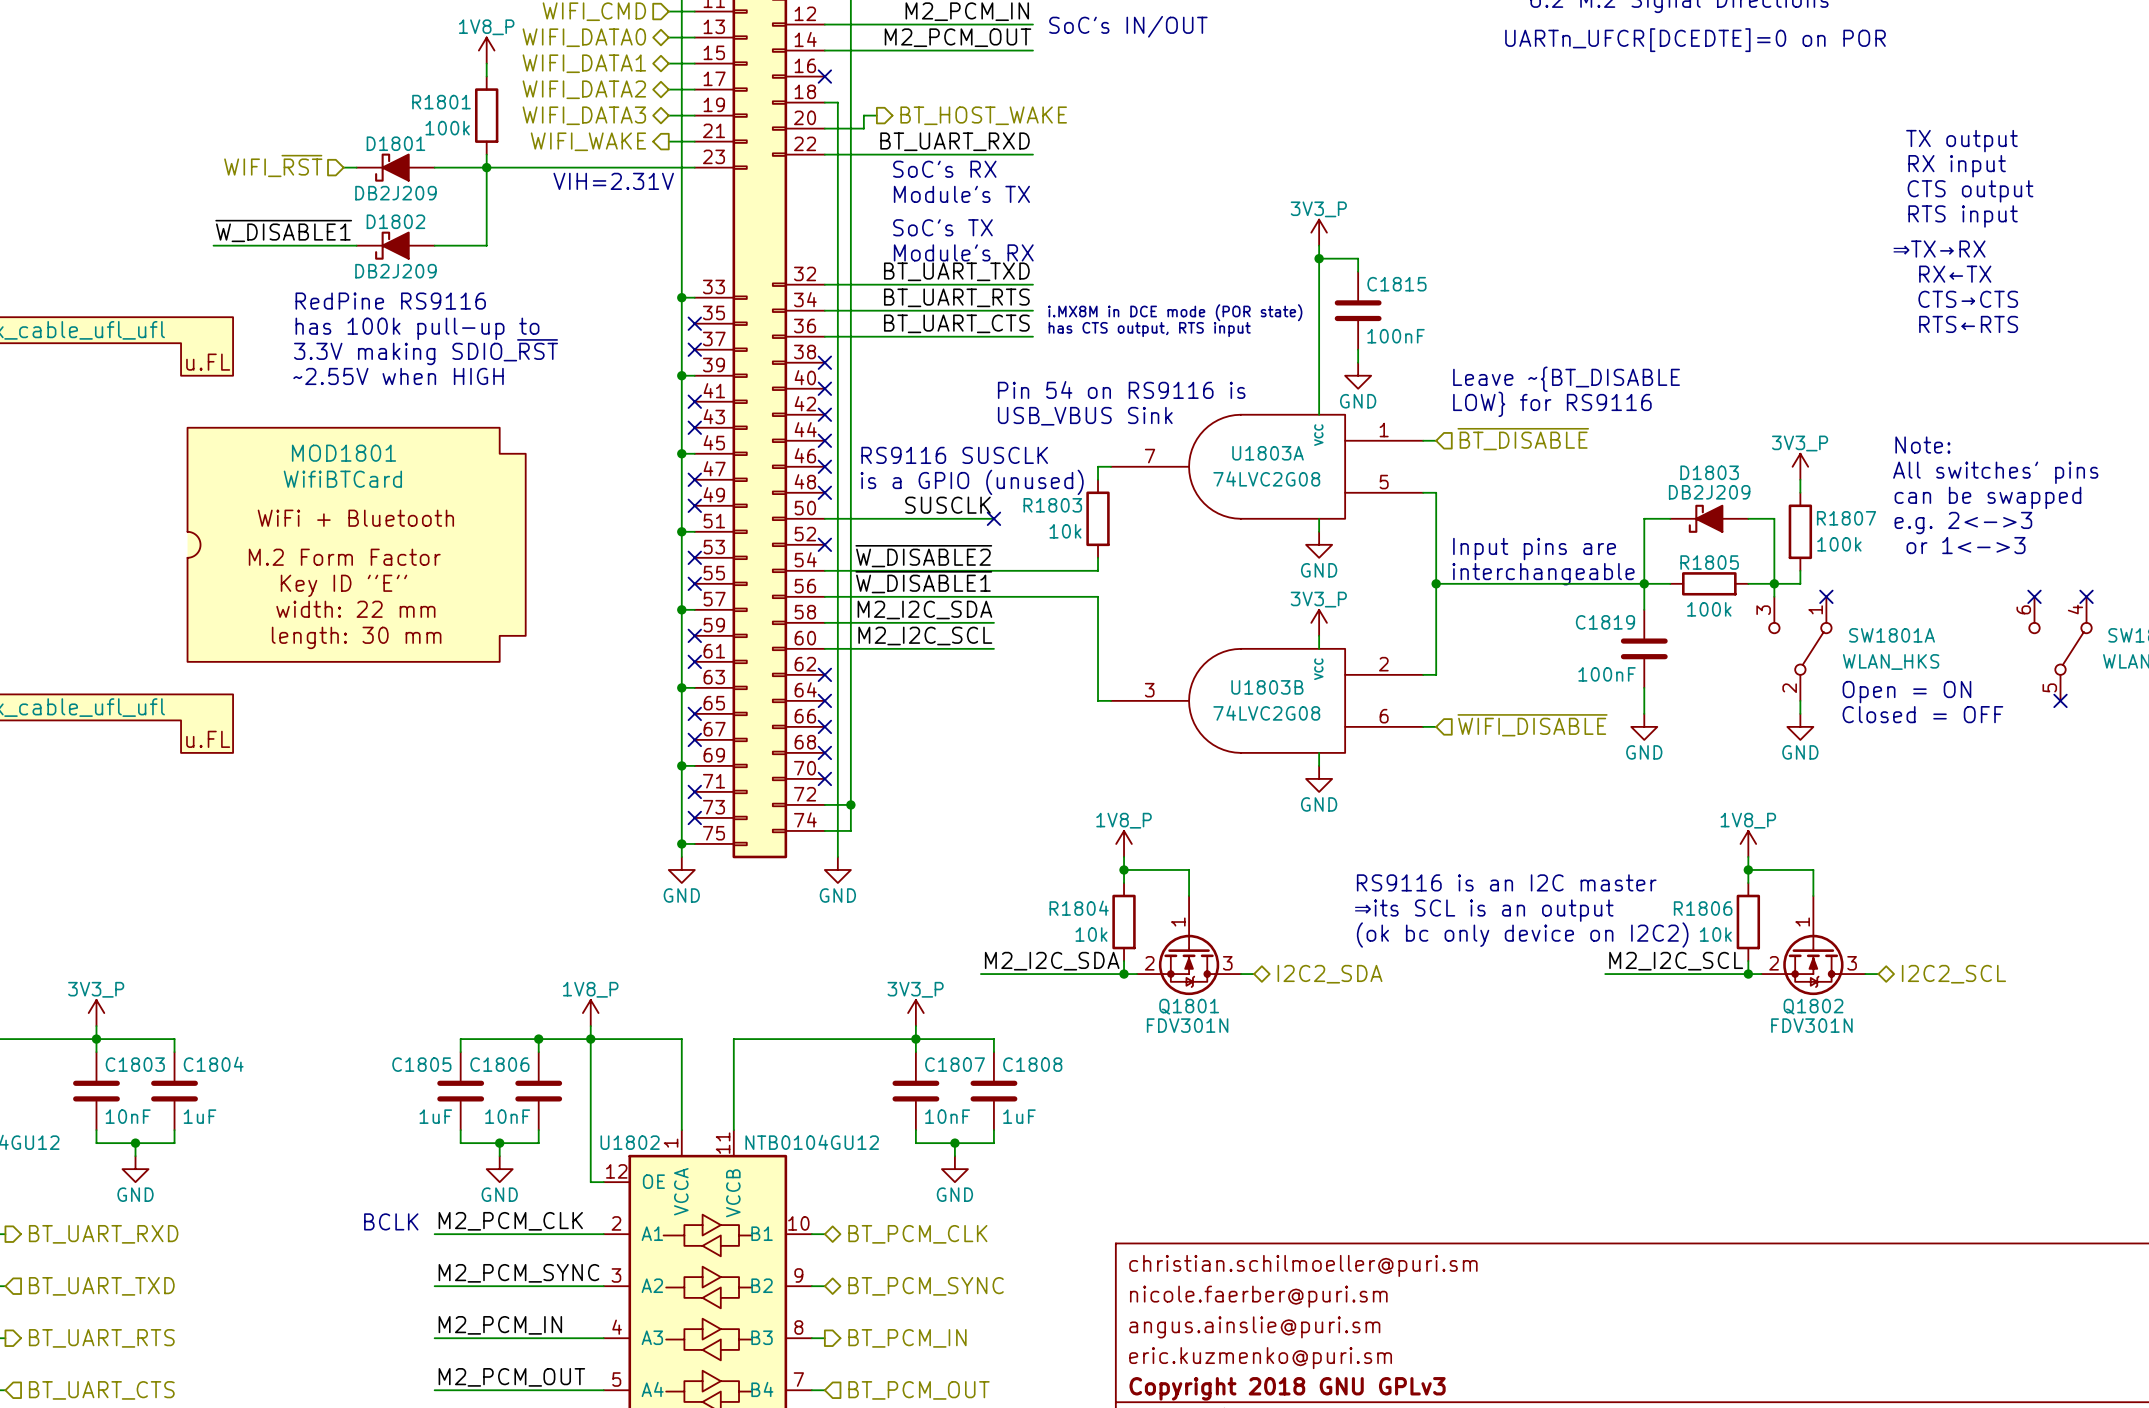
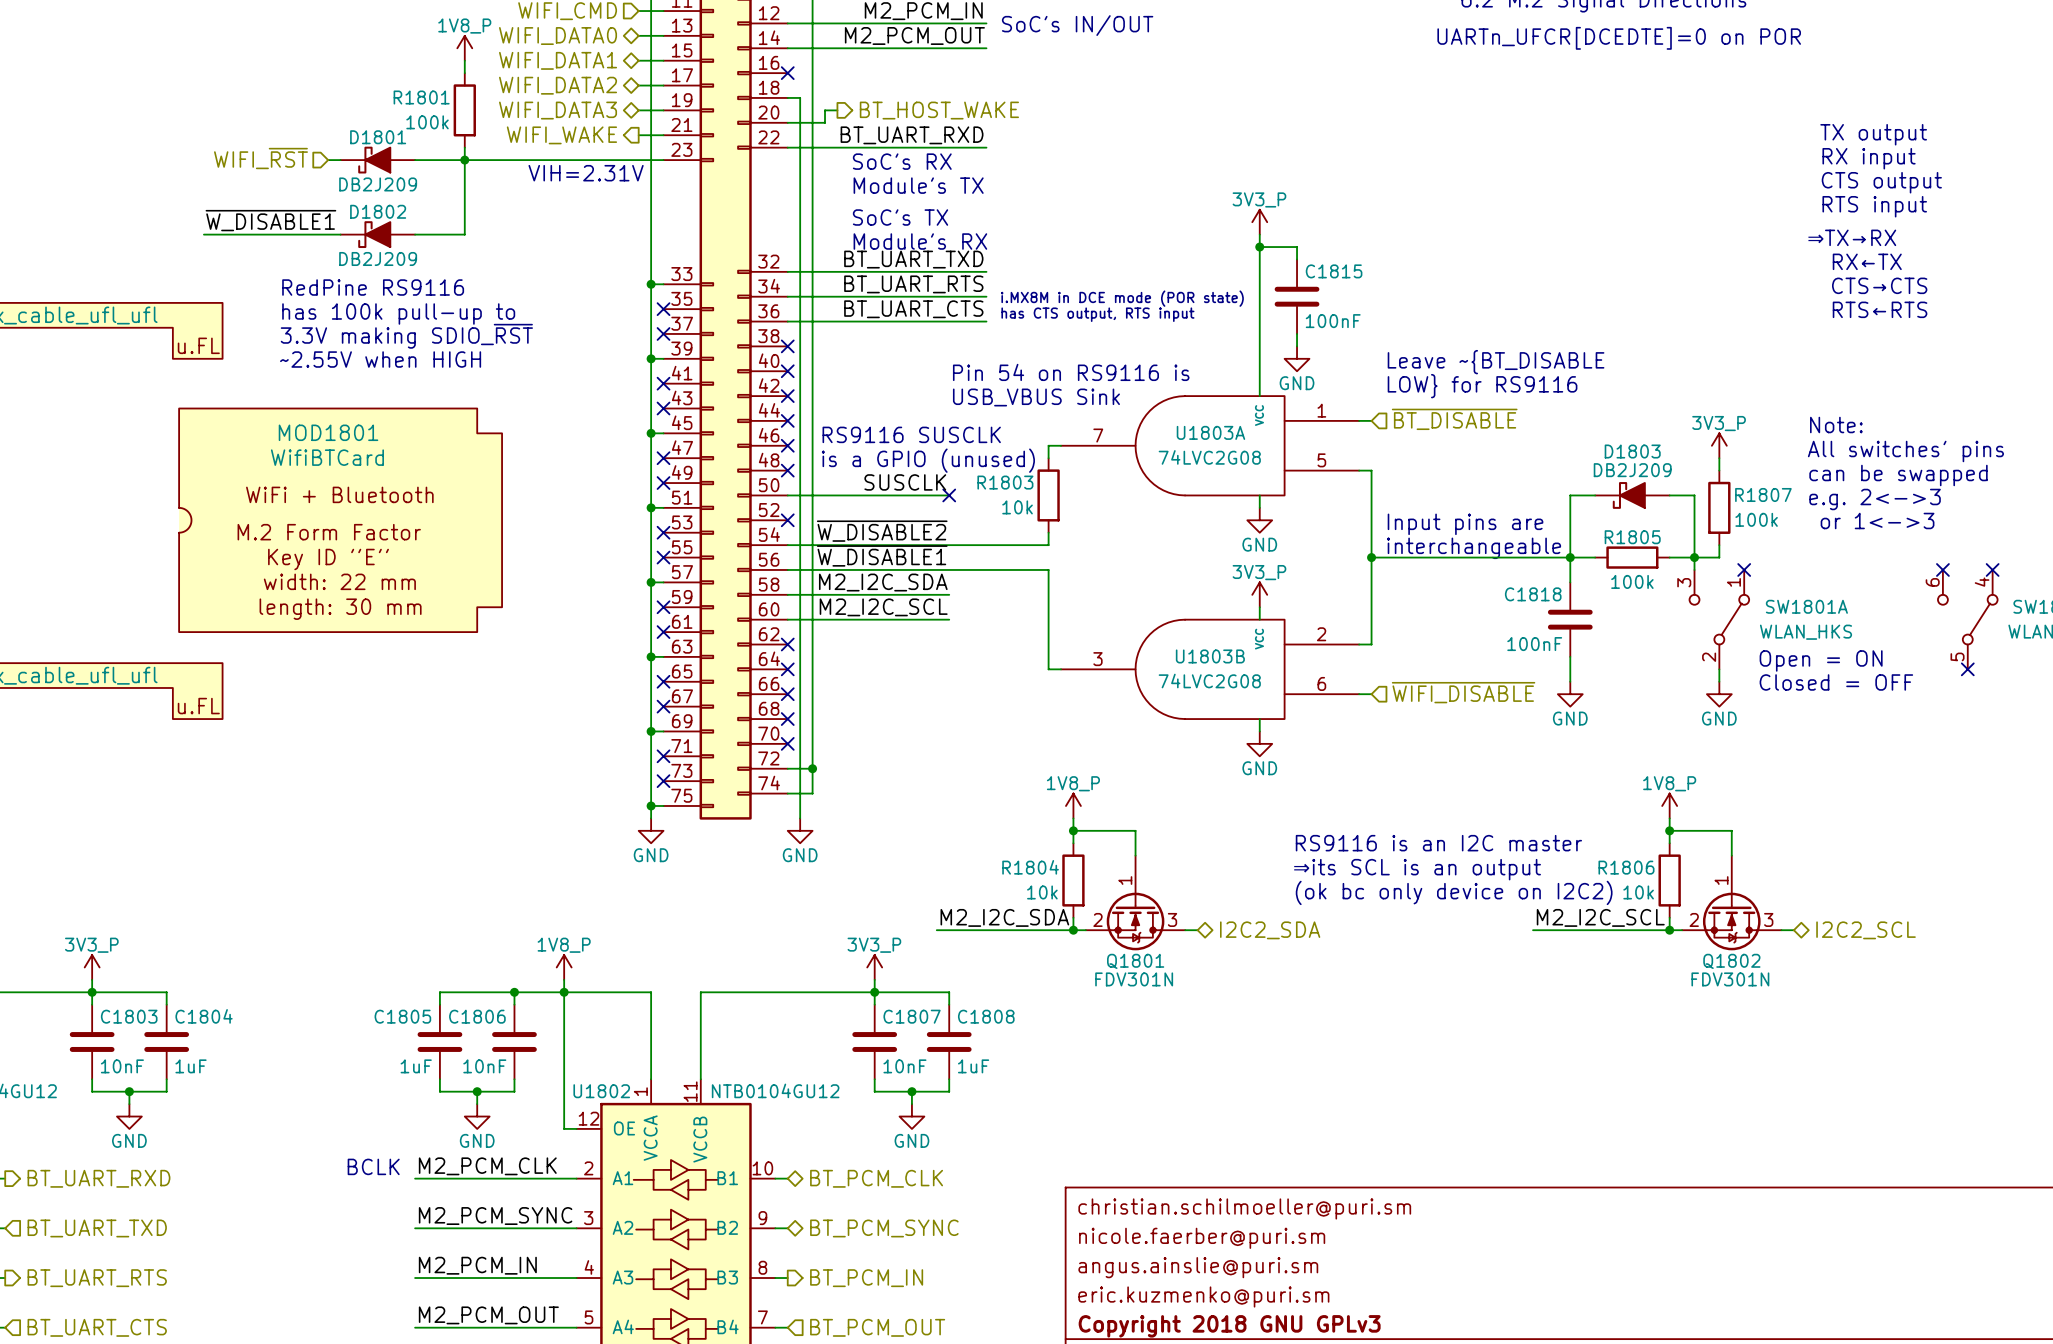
C1819 name: C1819 (1605, 622) -> C1818 (1533, 594)

